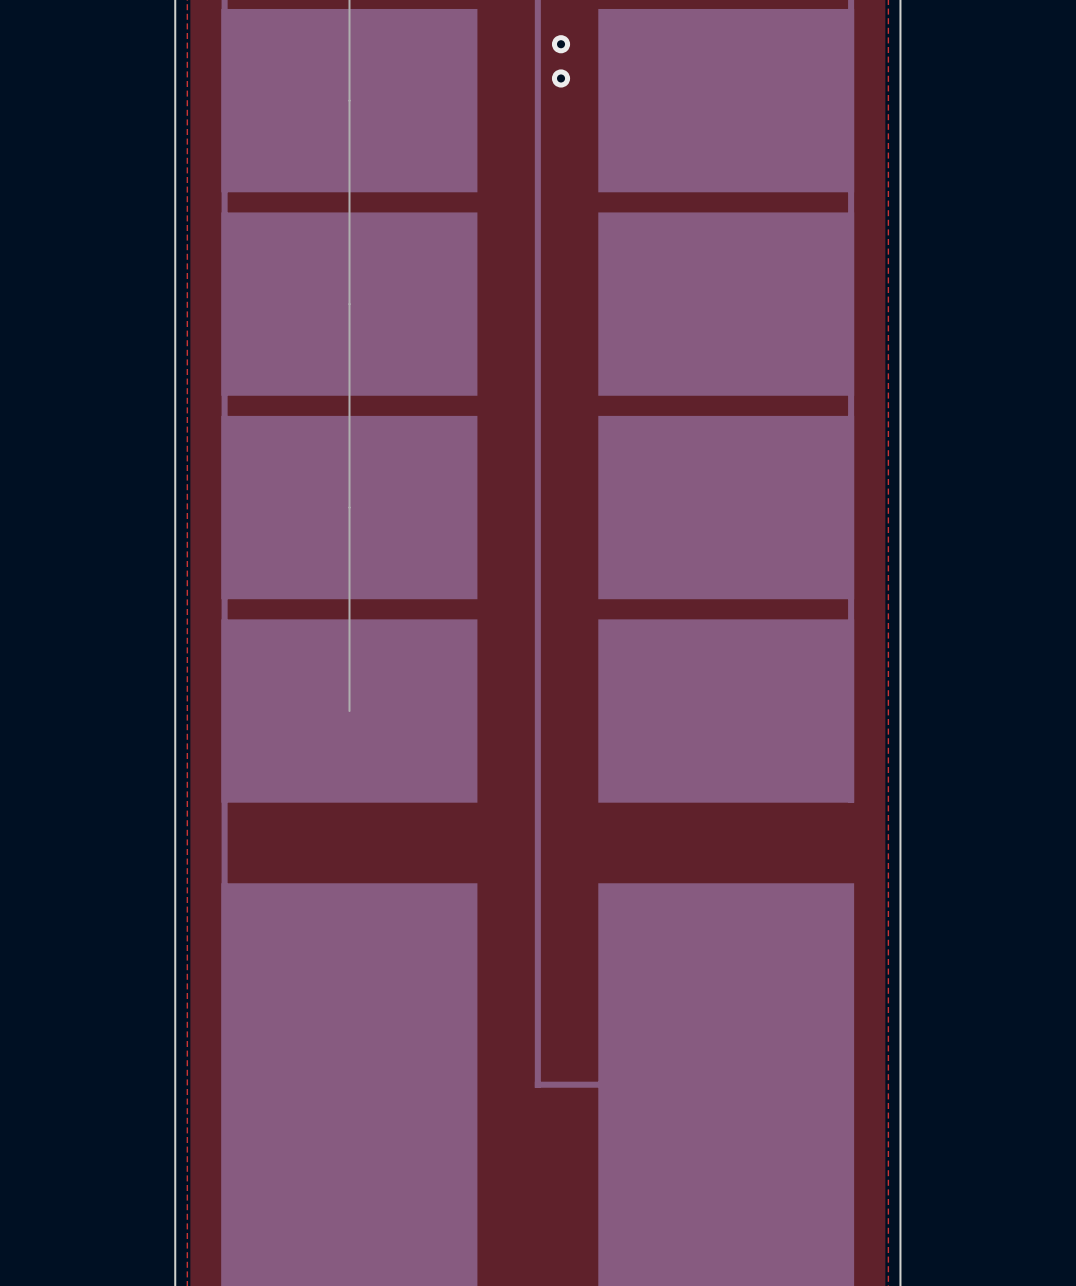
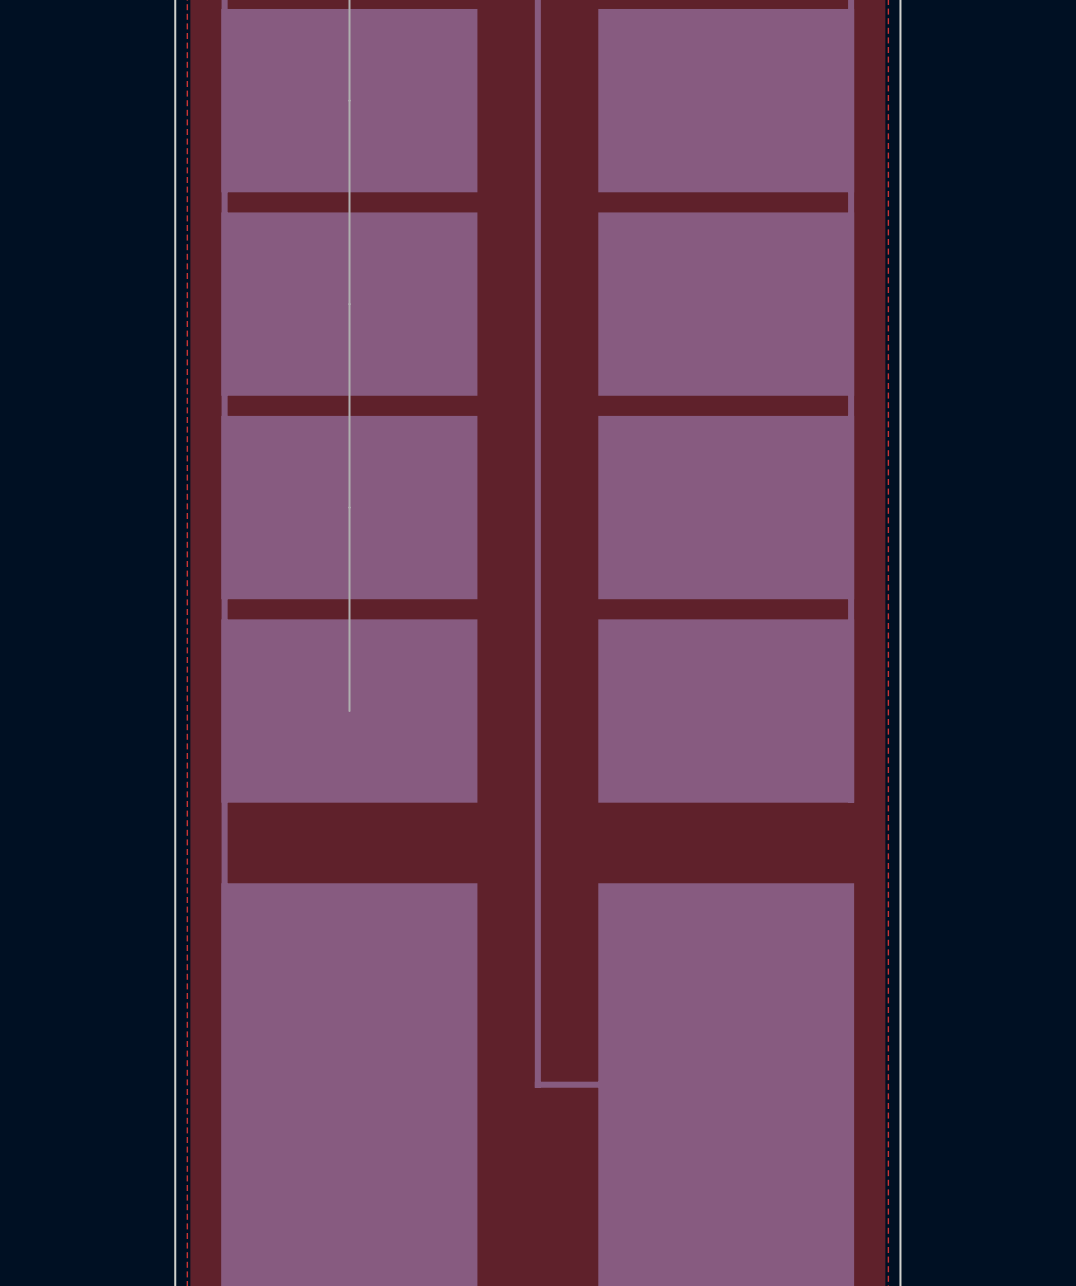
via: (561, 44) -> none
via: (561, 78) -> none

